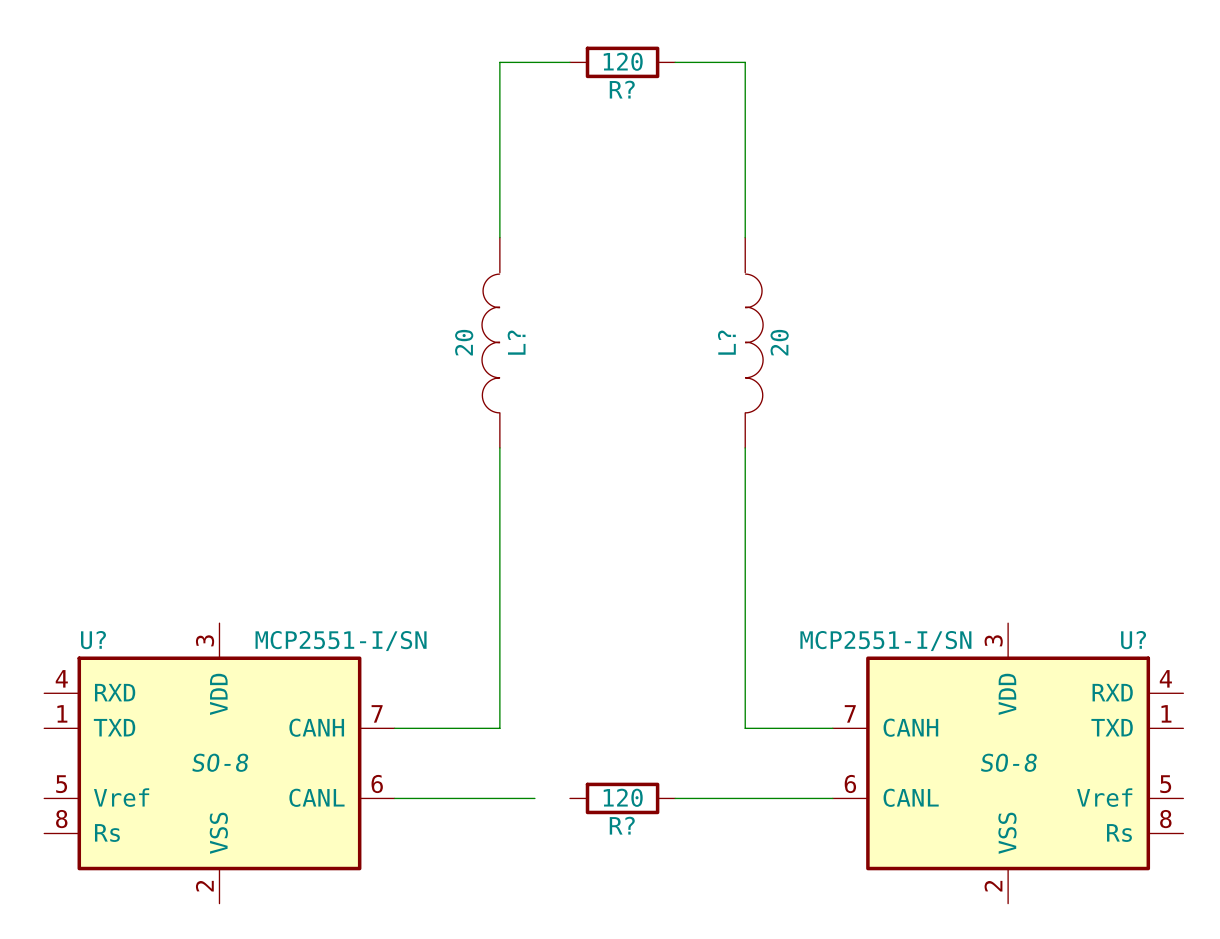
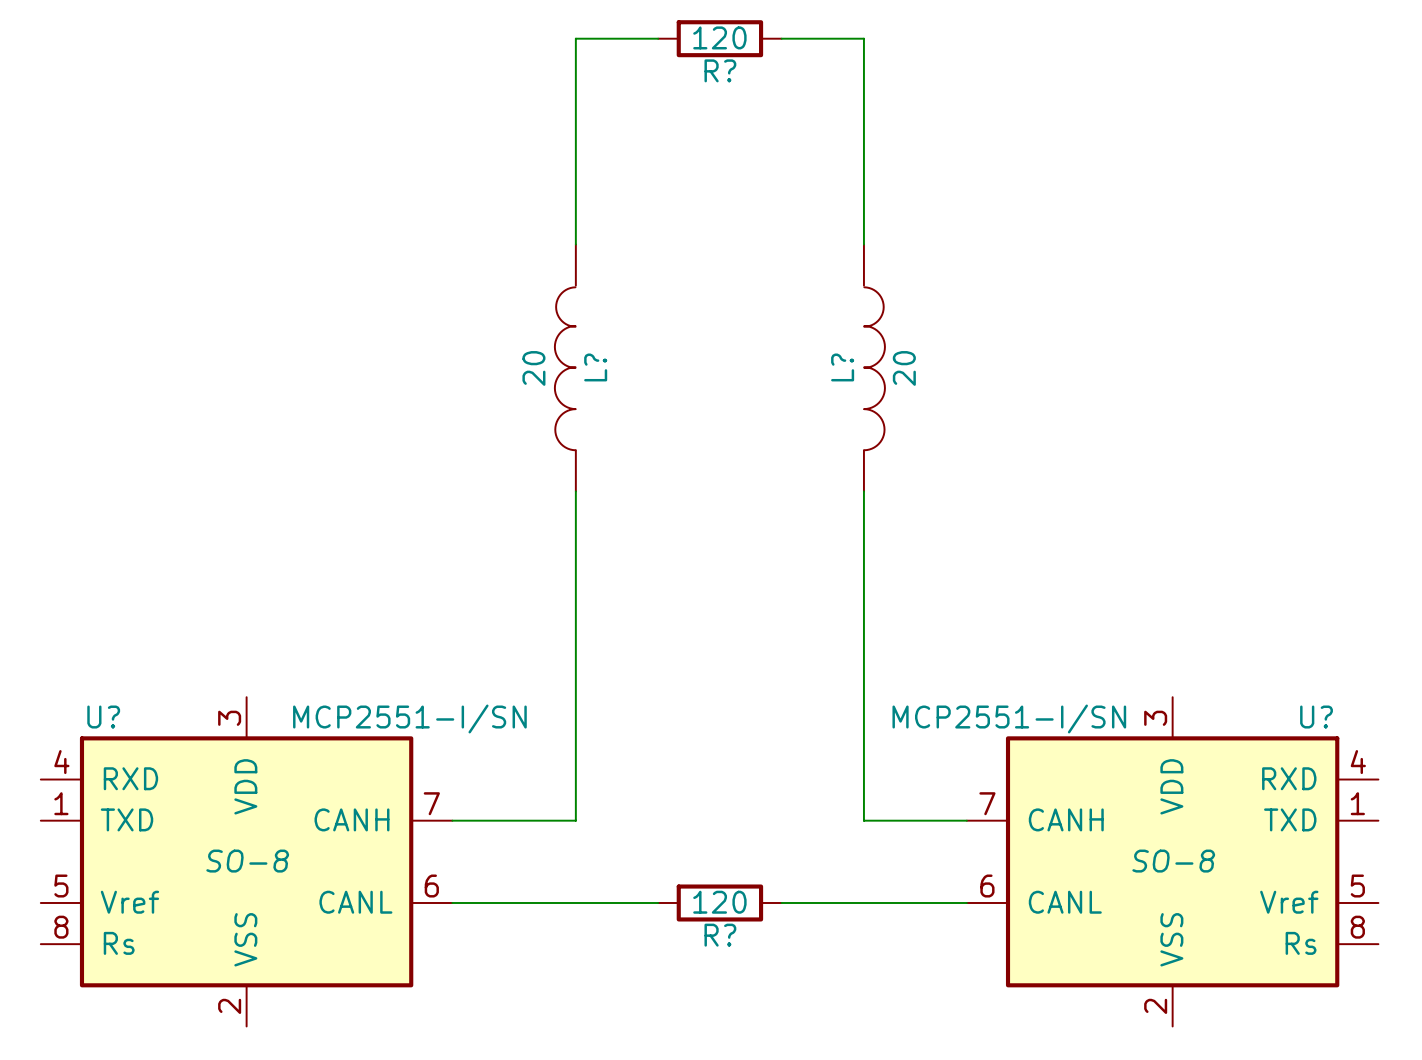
wire: none -> (617, 902) (658, 902)

